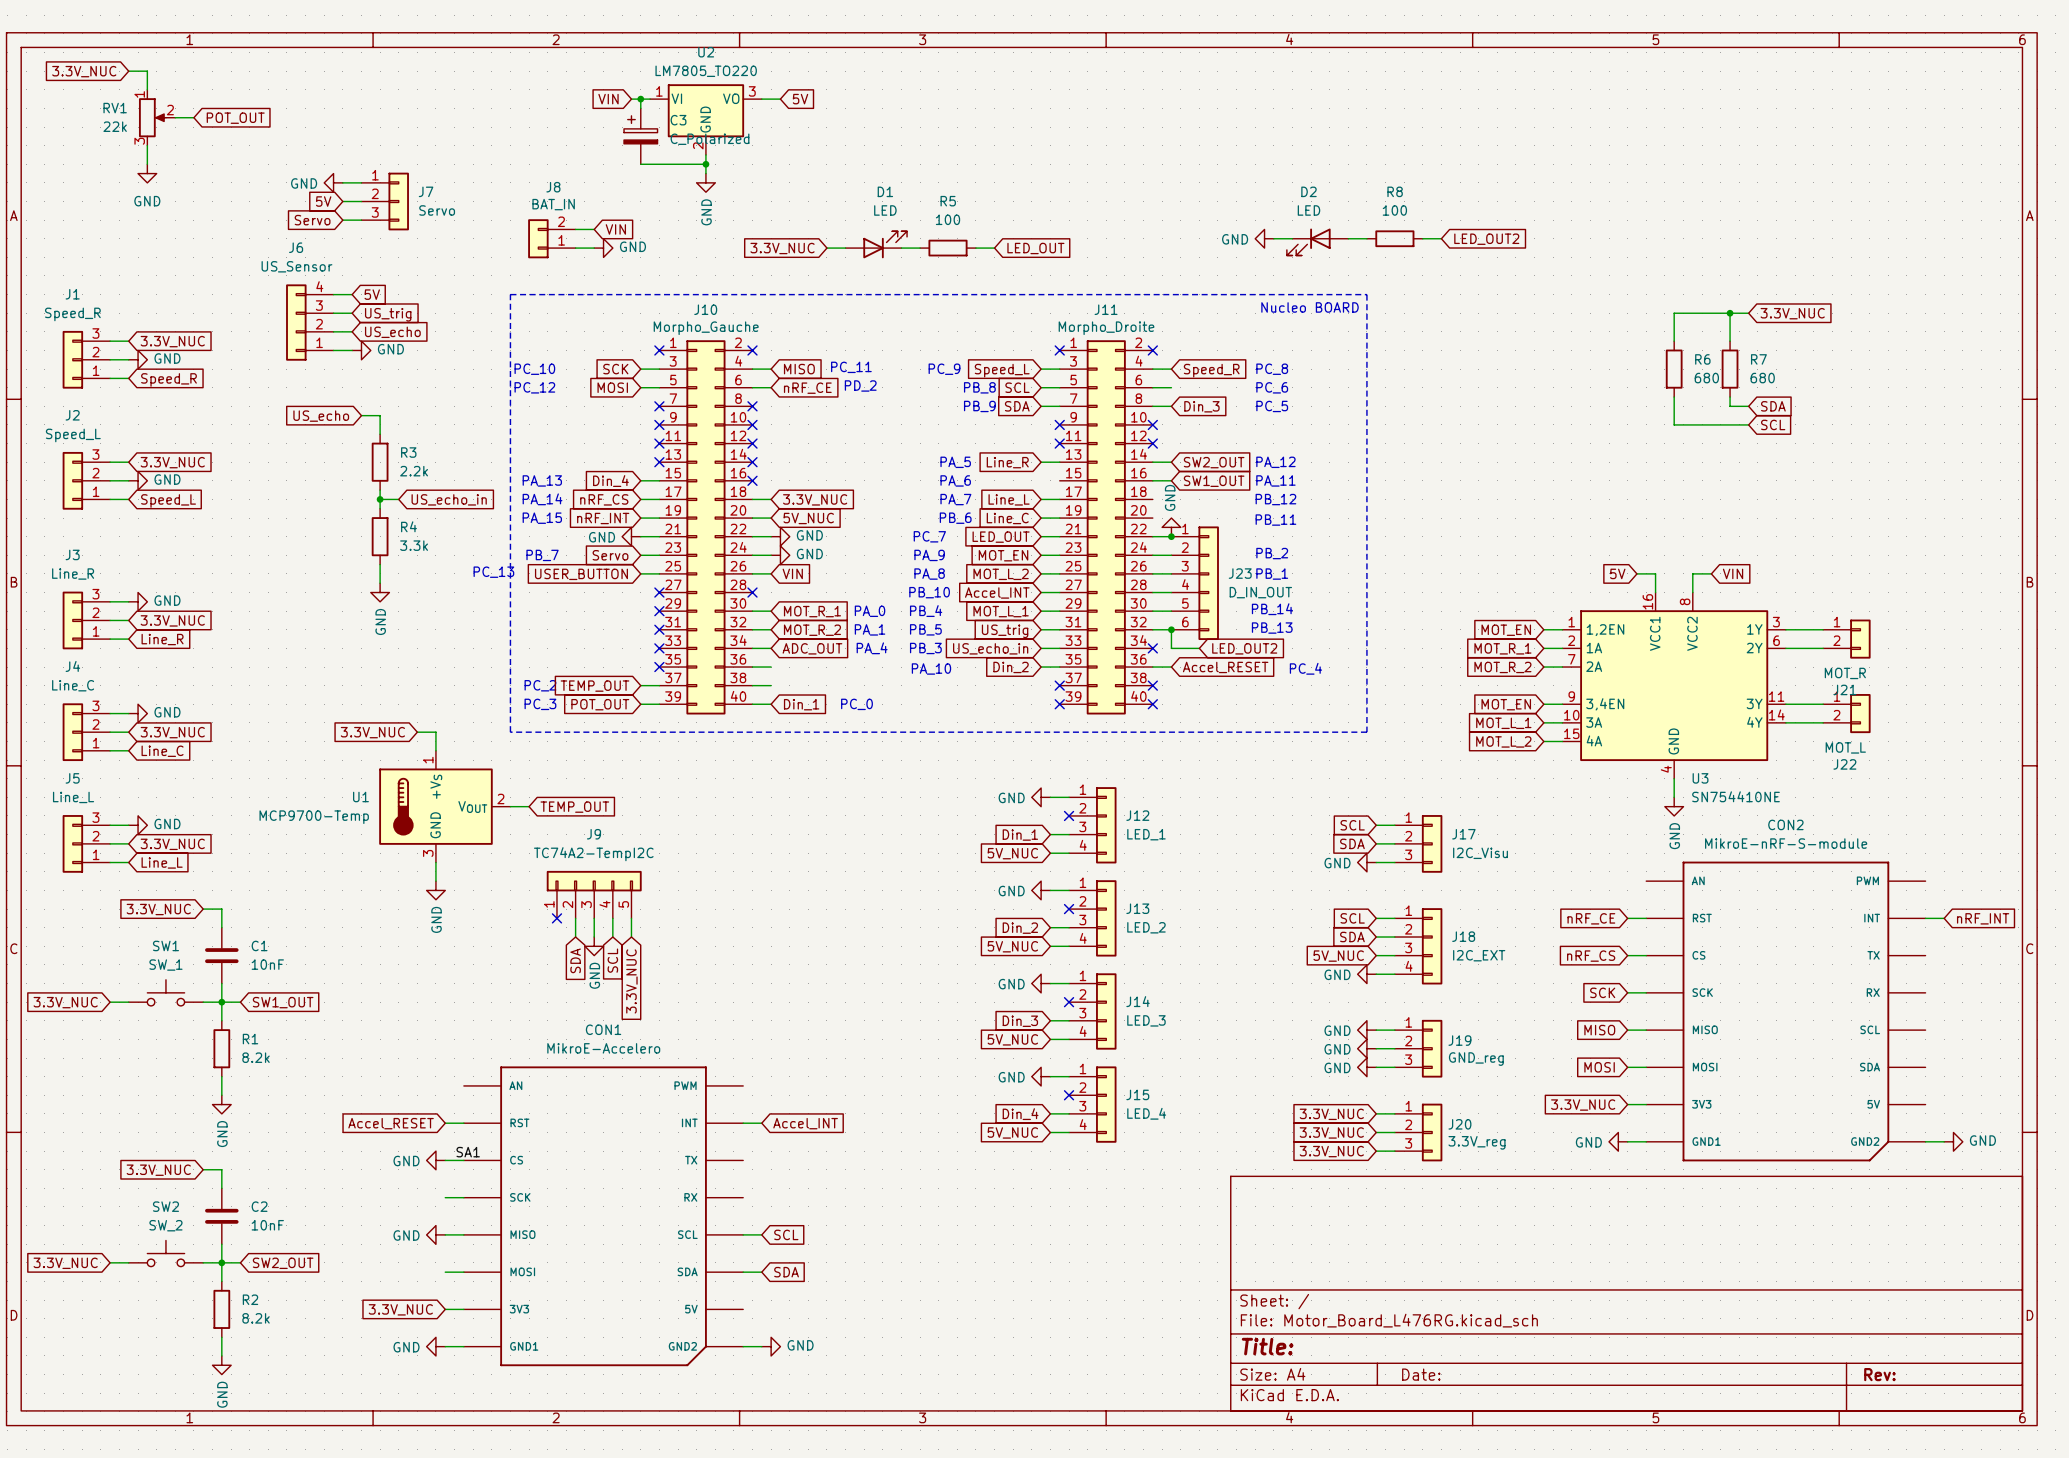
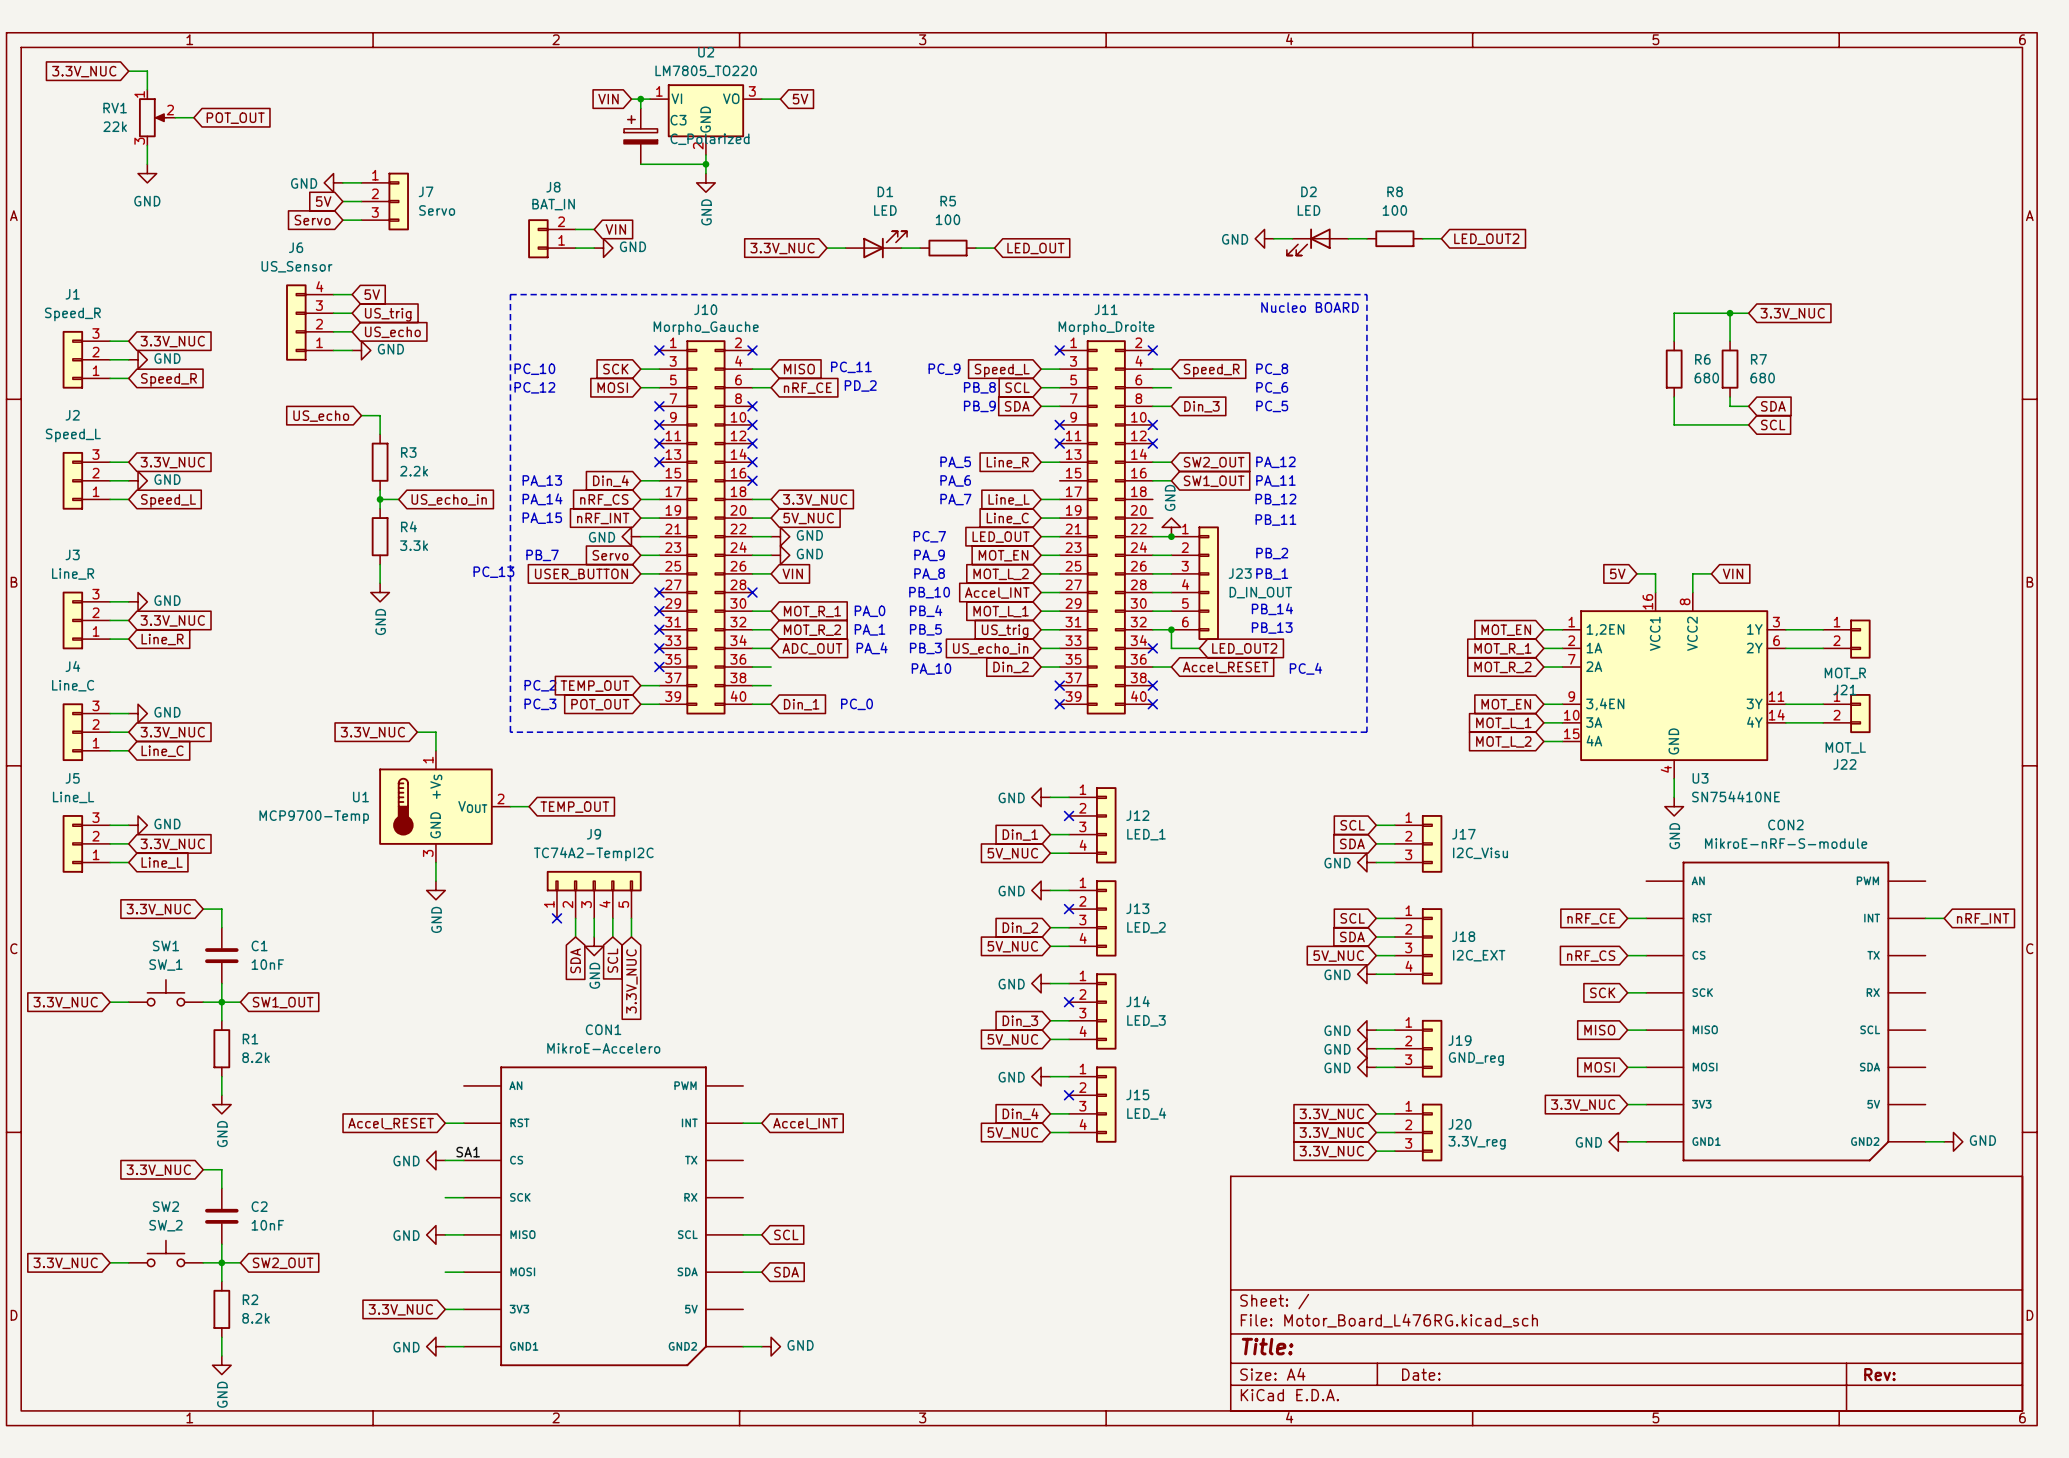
text: PB_6 (955, 518) -> none

